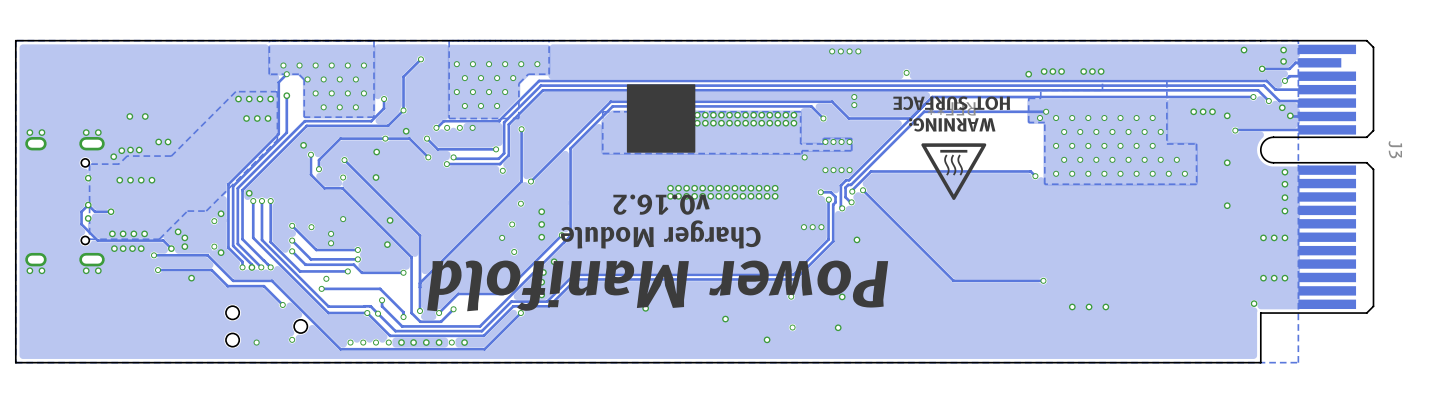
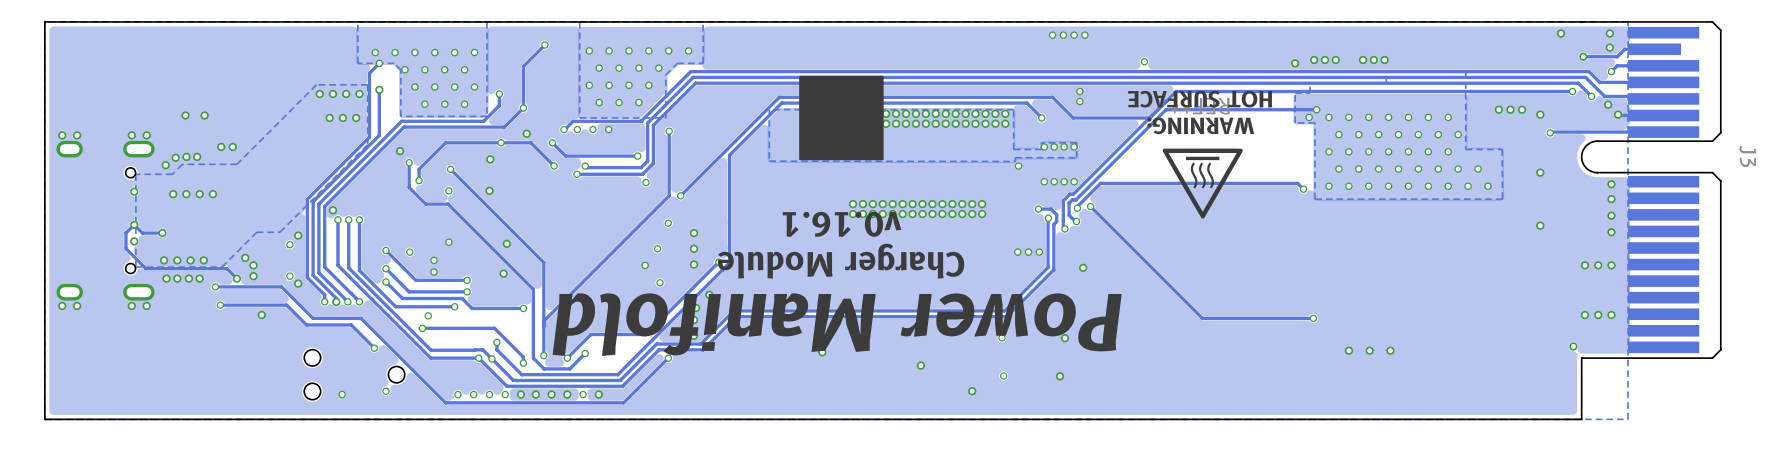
text: v0.16.2 (661, 204) -> v0.16.1 (842, 224)

